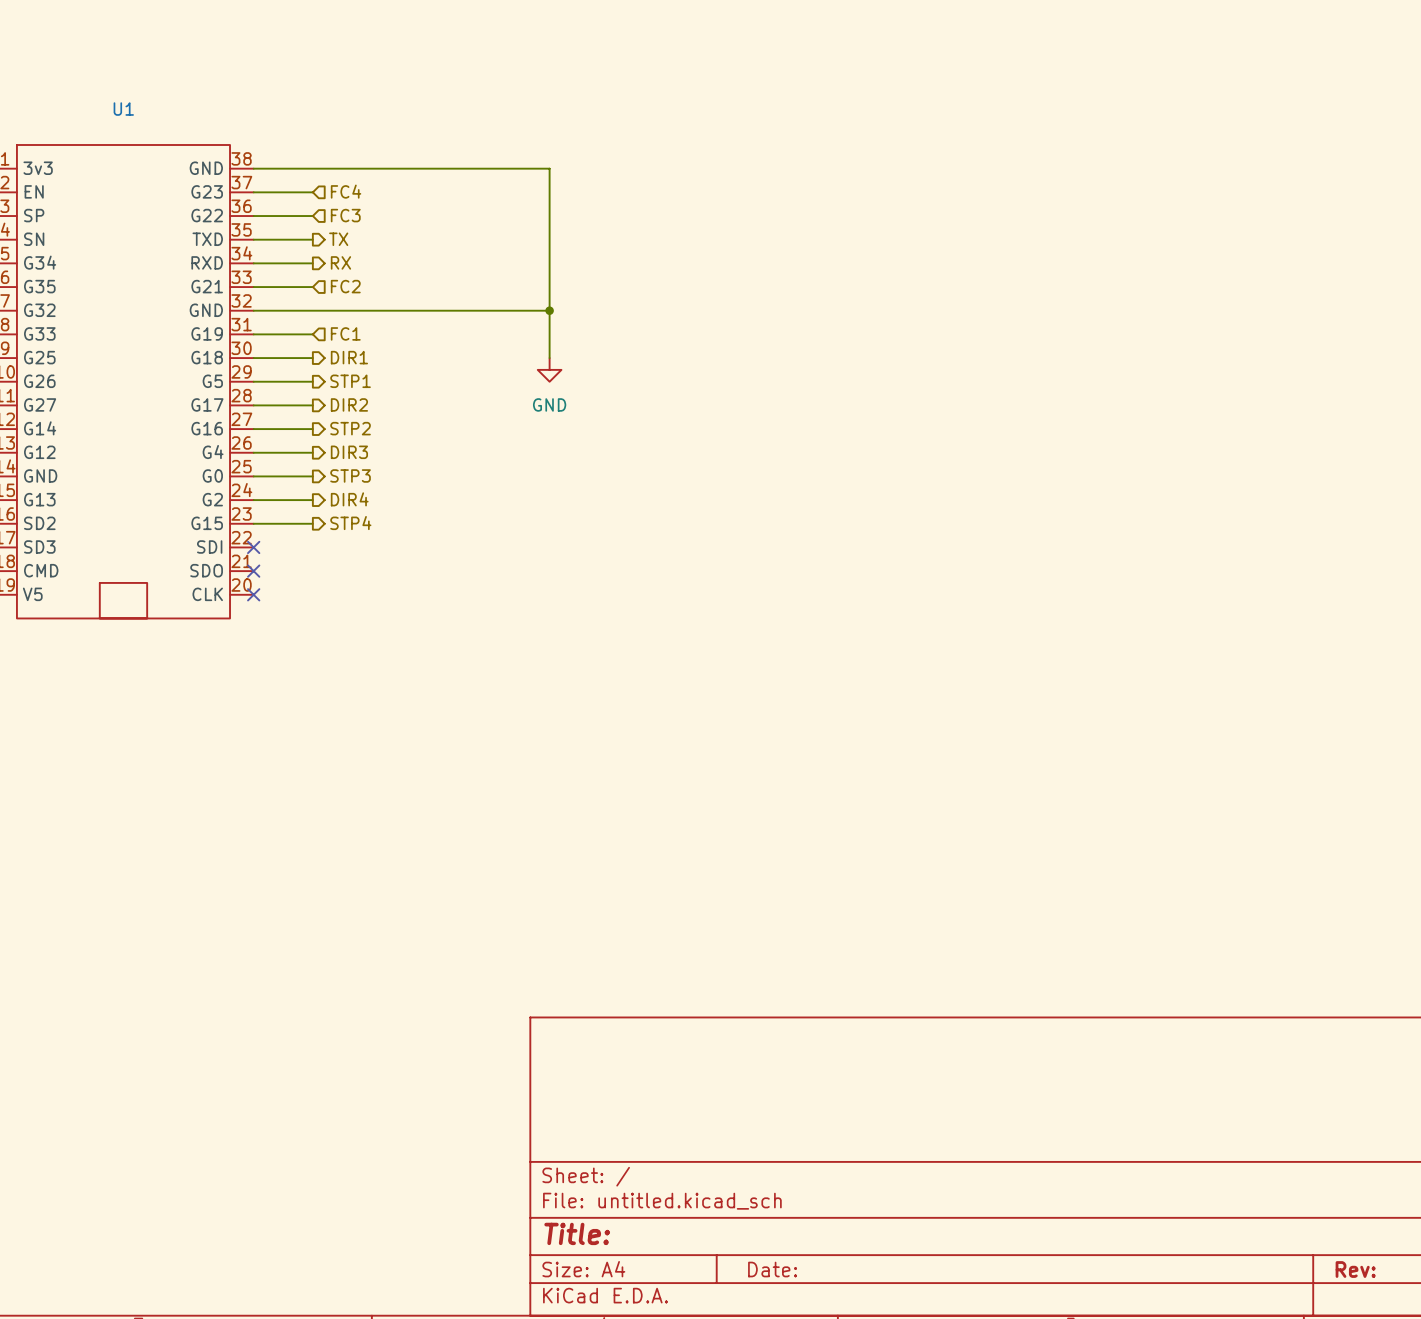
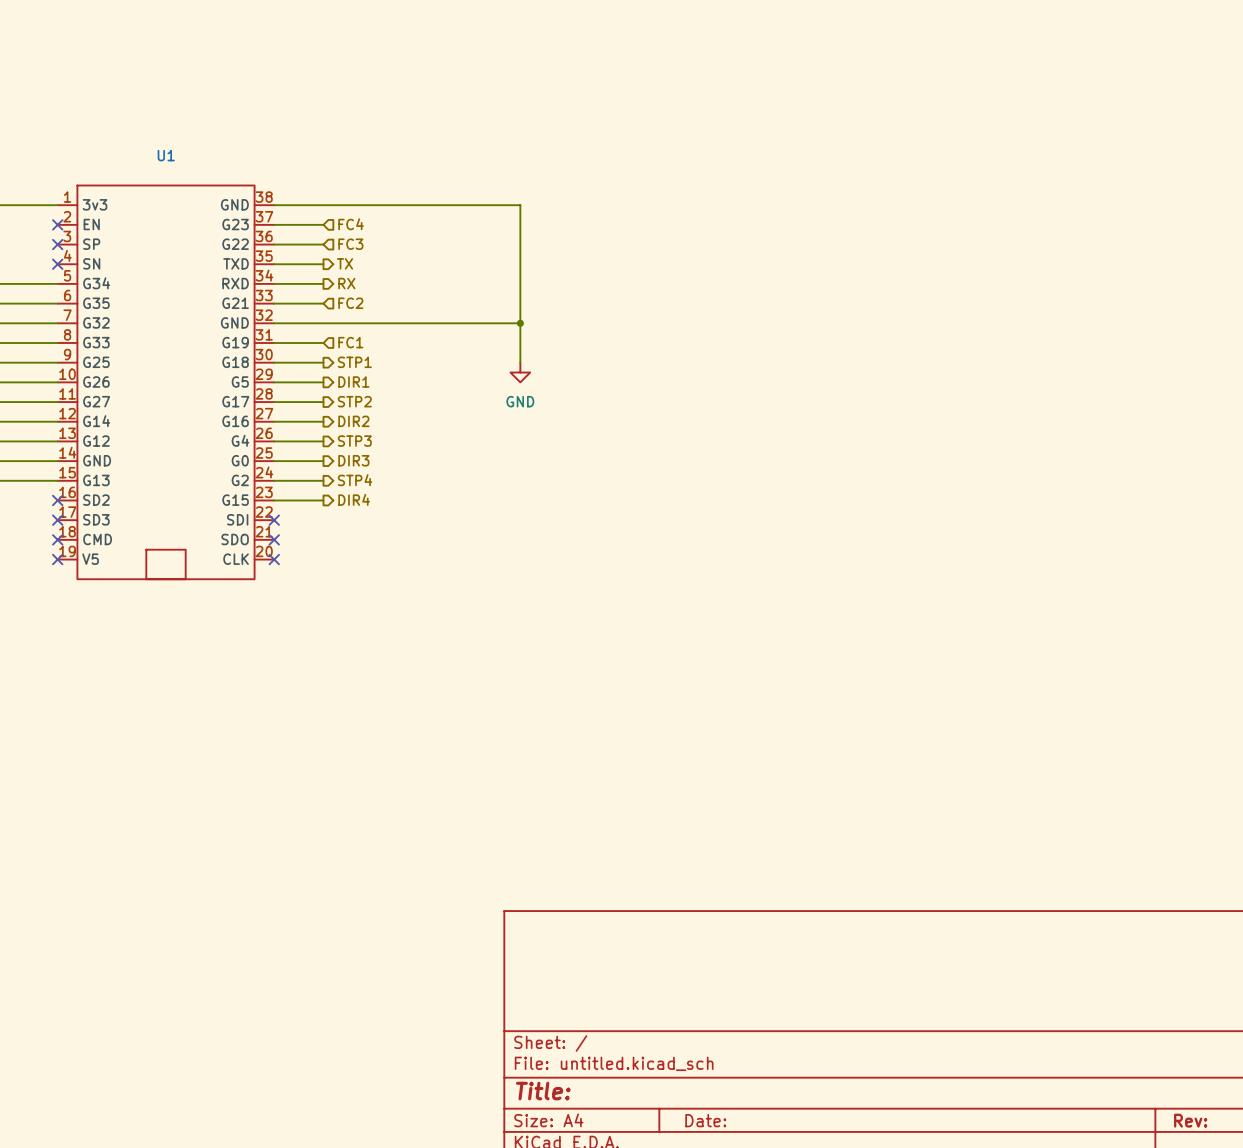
hierarchical label: DIR1 (349, 357) -> STP1 (354, 362)
hierarchical label: STP1 (350, 381) -> DIR1 (353, 382)
hierarchical label: DIR2 (349, 404) -> STP2 (354, 401)
hierarchical label: STP2 (350, 428) -> DIR2 (353, 421)
hierarchical label: DIR3 (349, 452) -> STP3 (354, 441)
hierarchical label: STP3 (350, 475) -> DIR3 (353, 460)
hierarchical label: DIR4 (349, 499) -> STP4 (355, 480)
hierarchical label: STP4 (350, 523) -> DIR4 (354, 499)

